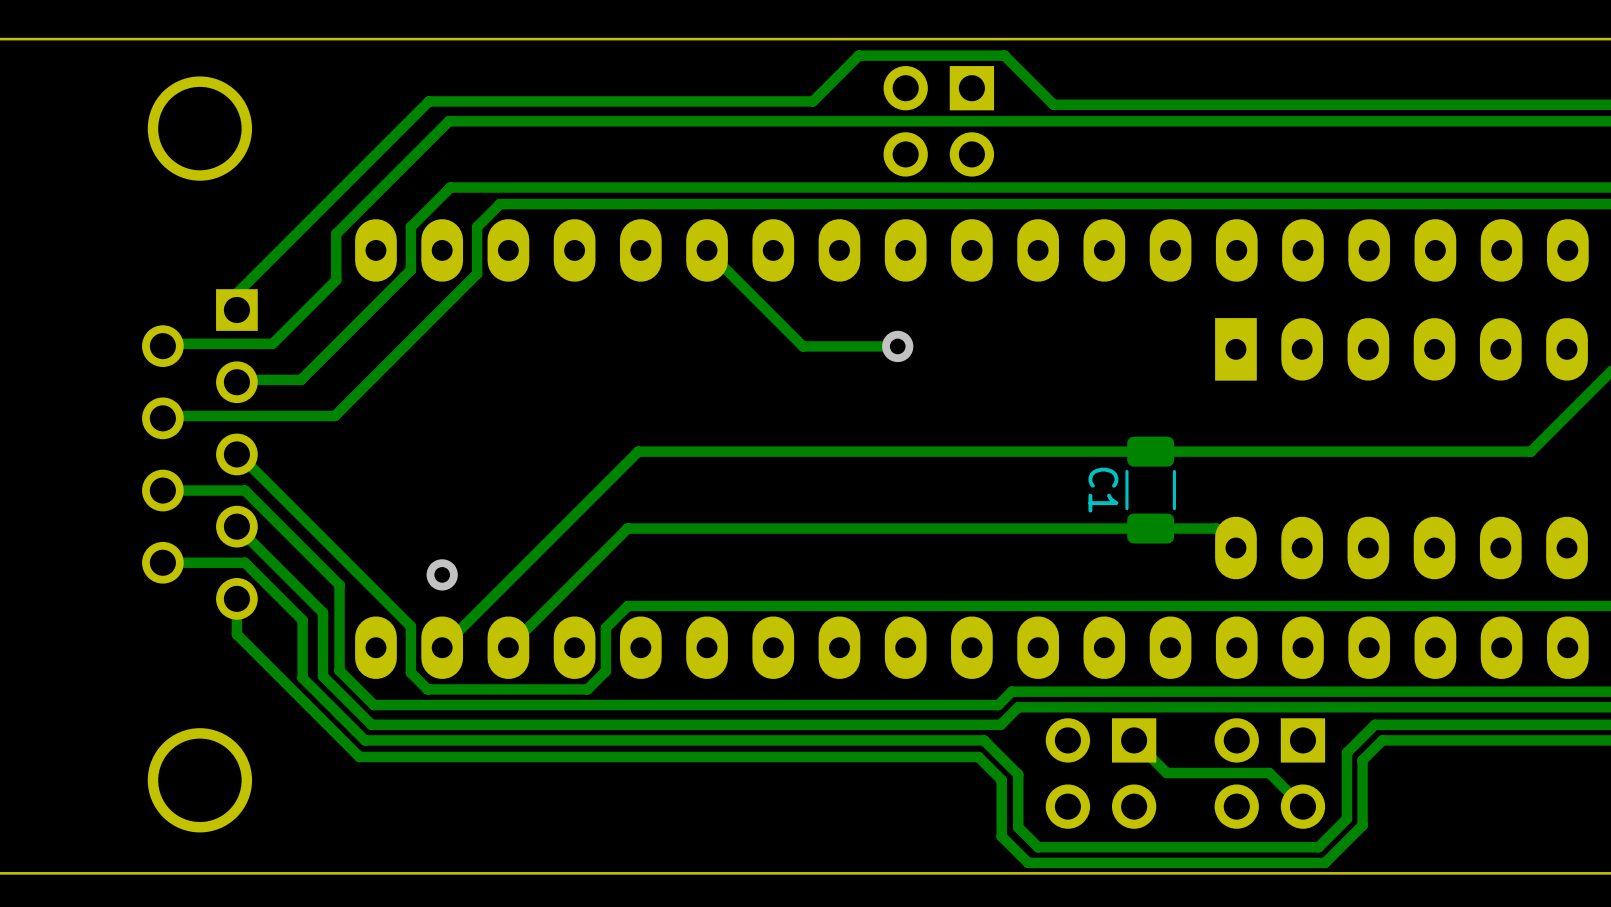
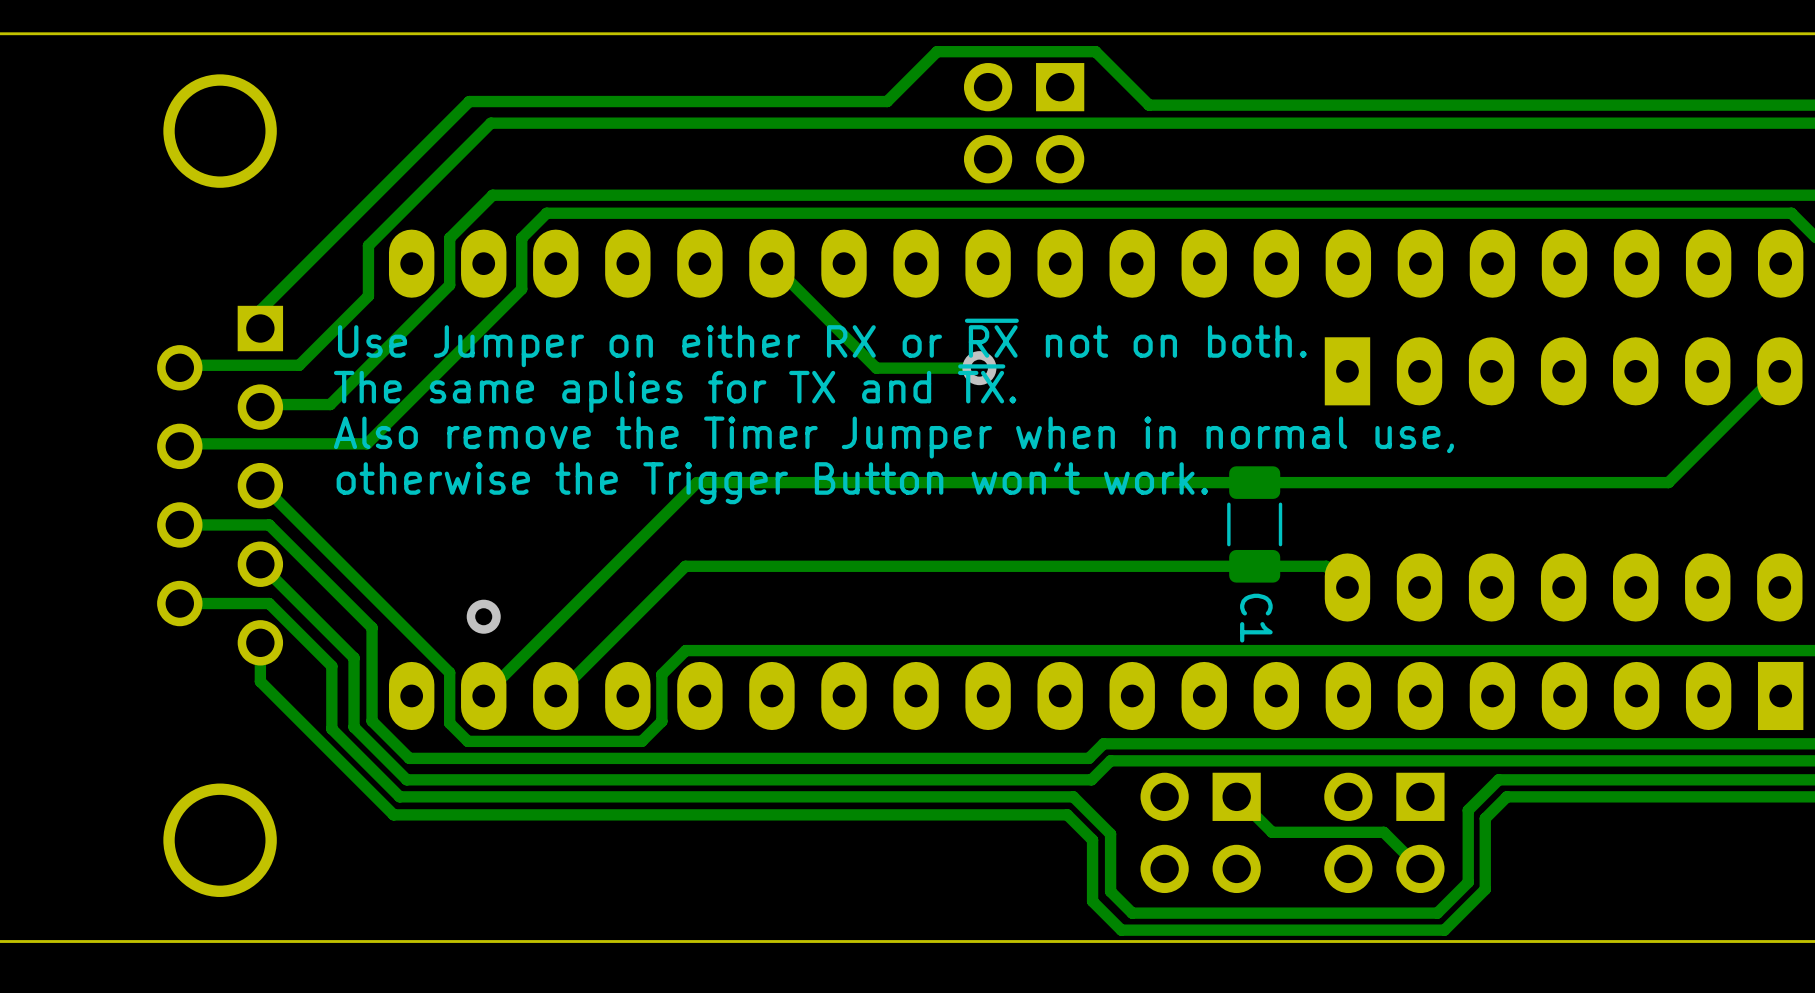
text: none -> Use Jumper on either RX or ~{RX} not on both. (822, 342)
text: none -> The same aplies for TX and ~{TX}. (675, 388)
text: none -> Also remove the Timer Jumper when in normal use, (893, 437)
text: none -> otherwise the Trigger Button won't work. (772, 483)
C1 name position: C1 (1103, 490) -> C1 (1256, 618)

